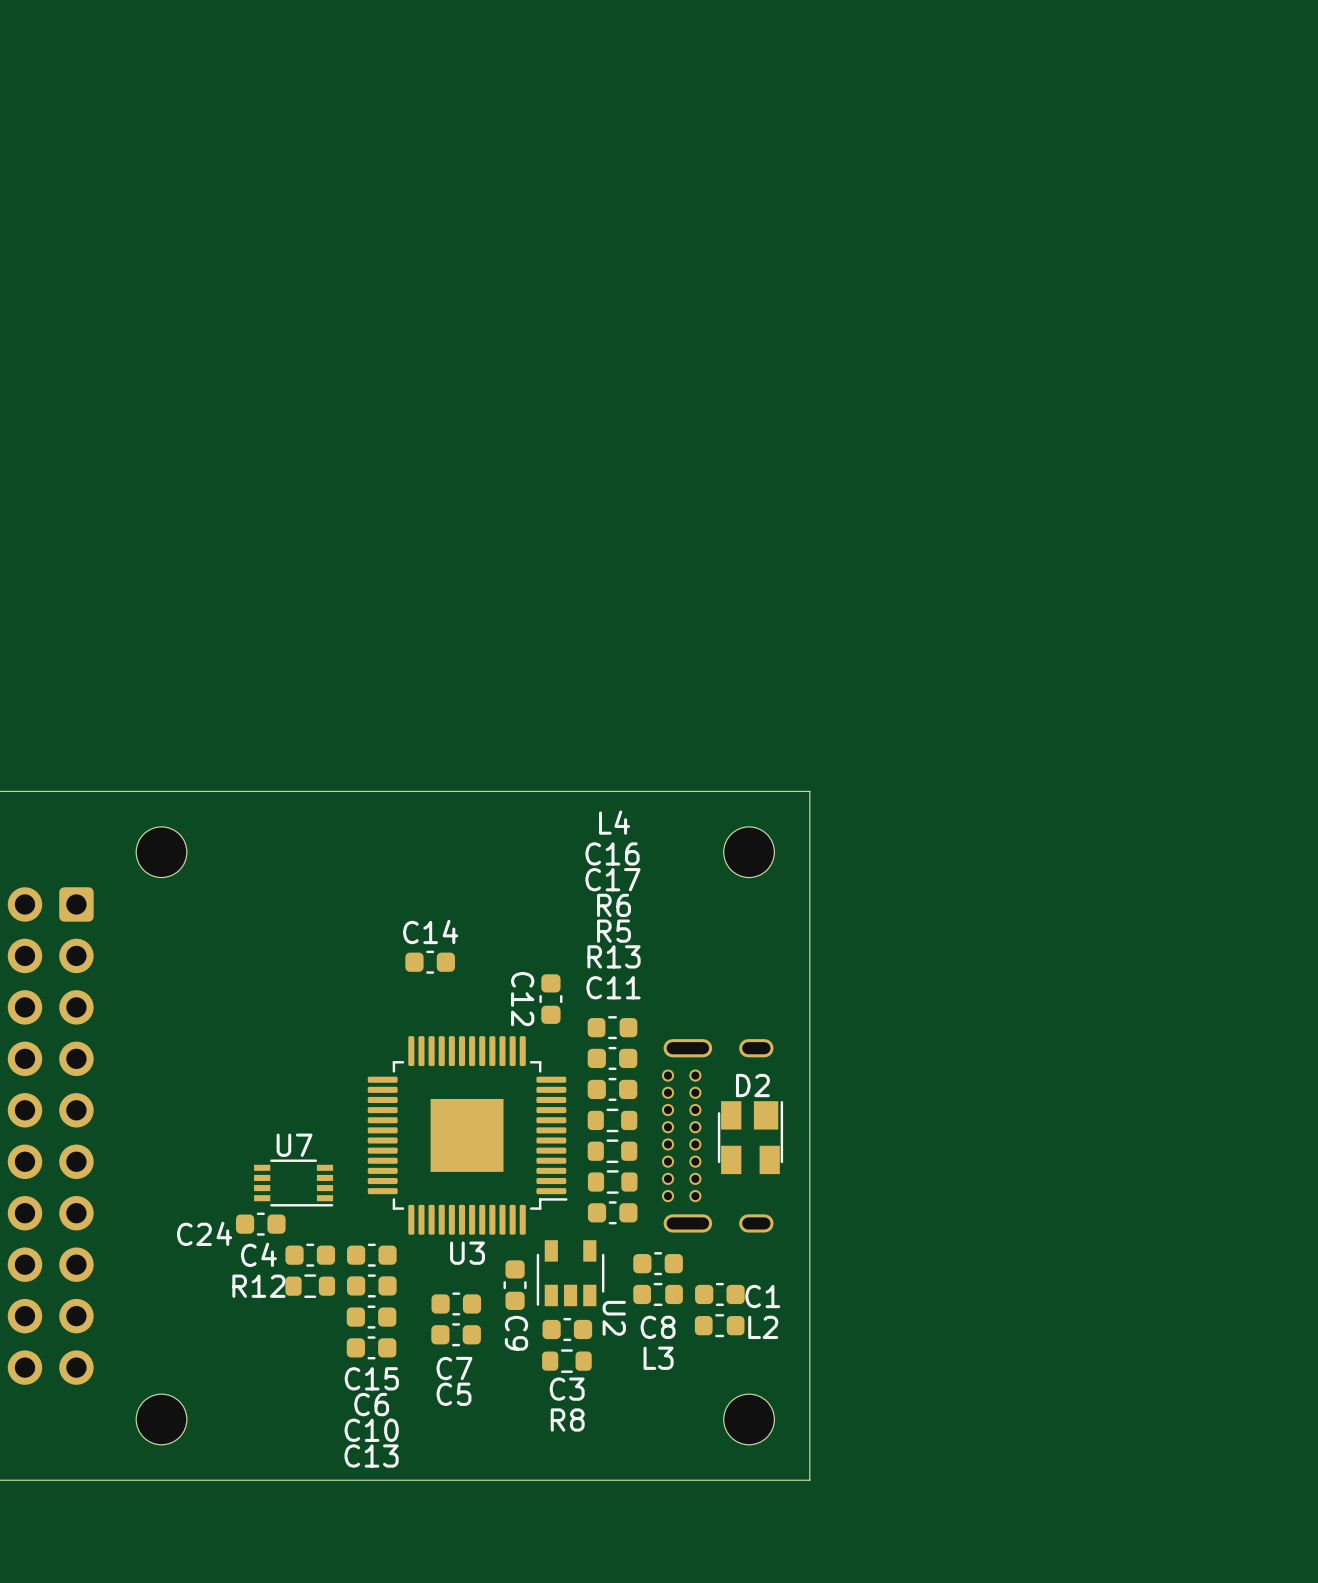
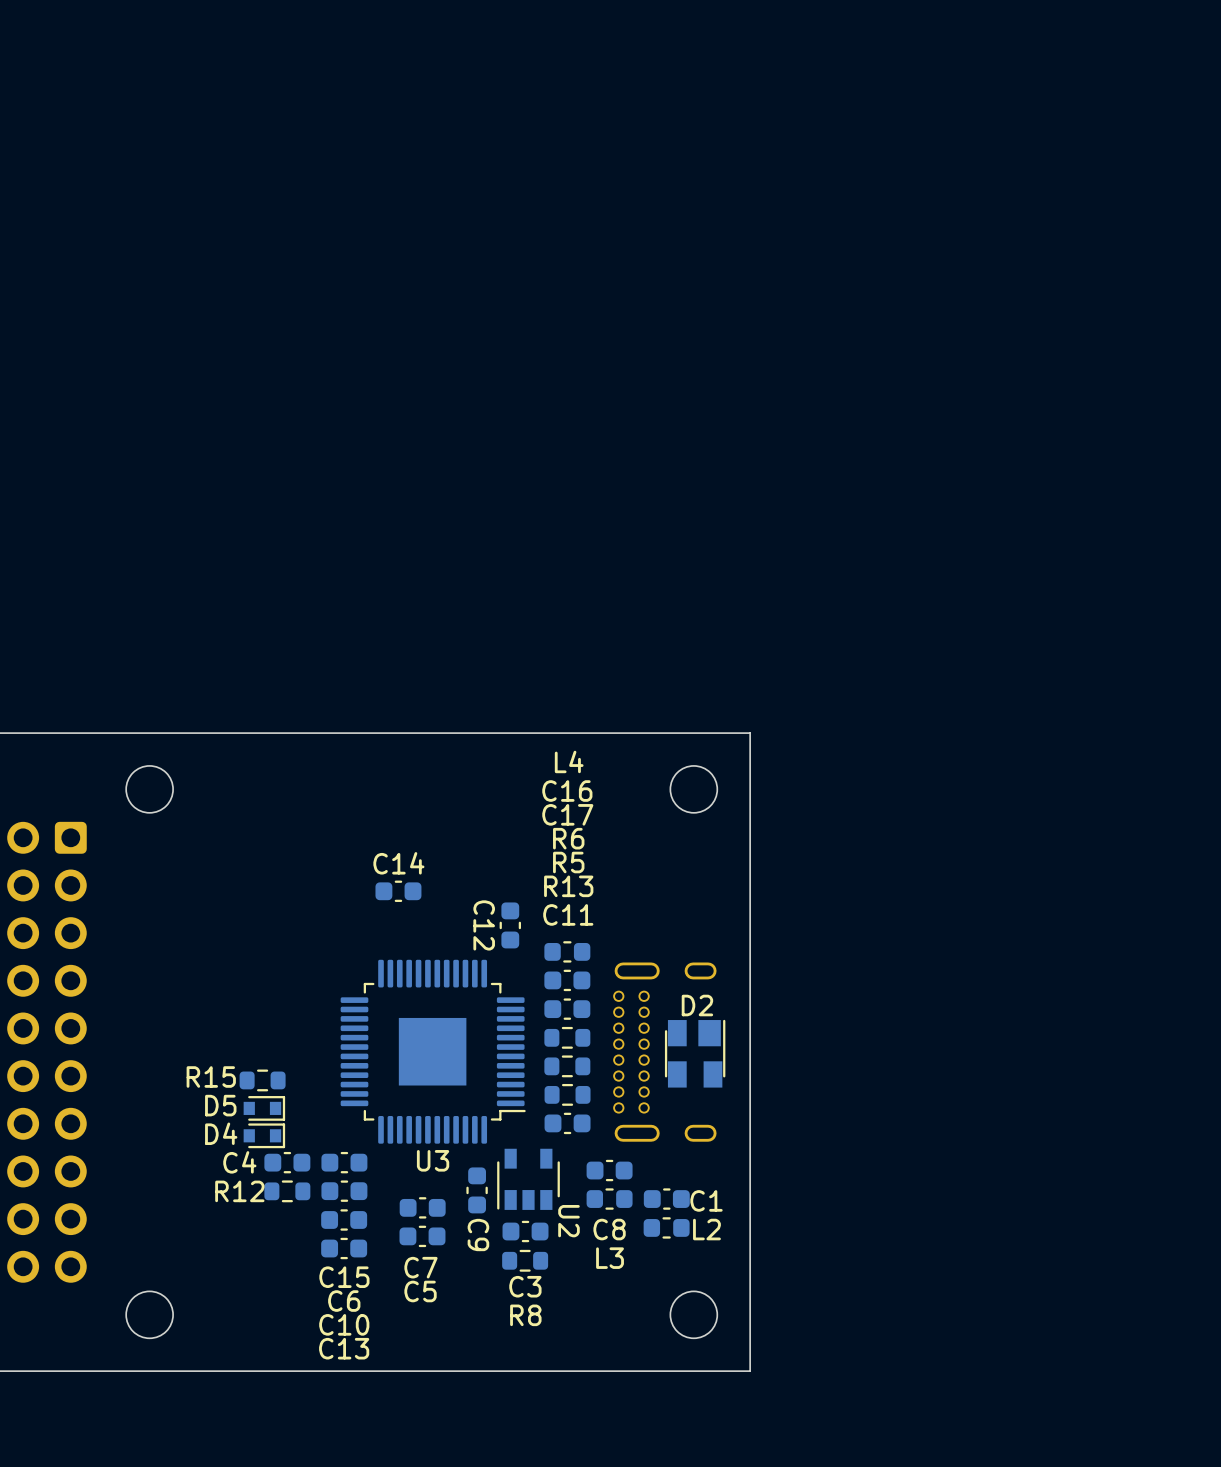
R15: none -> (262, 1080)
U7: (293, 1182) -> none
D5: none -> (264, 1108)
C24: (260, 1224) -> none
D4: none -> (264, 1135)

